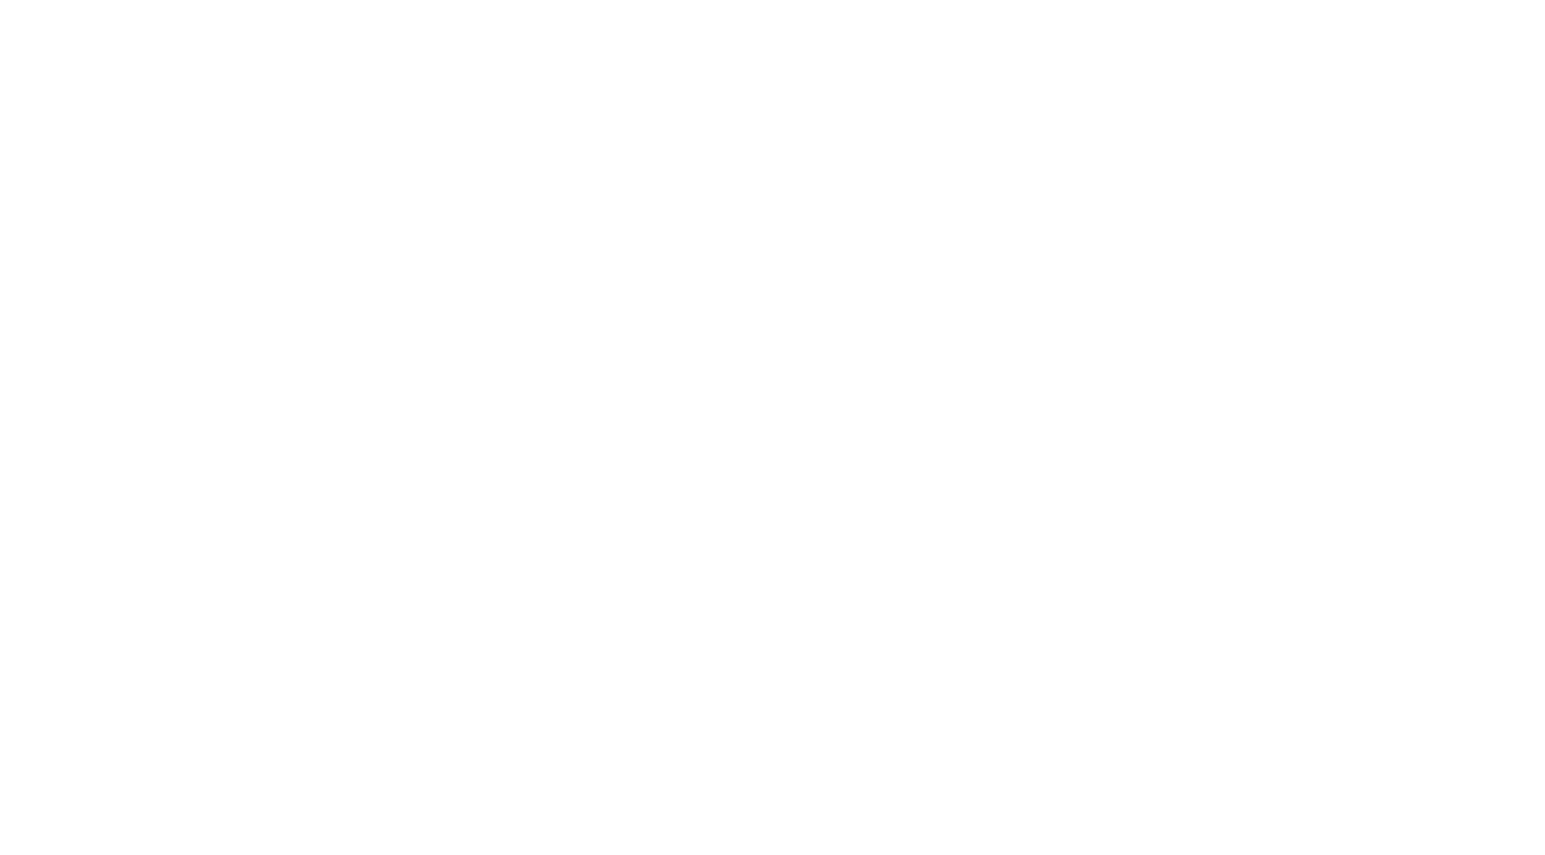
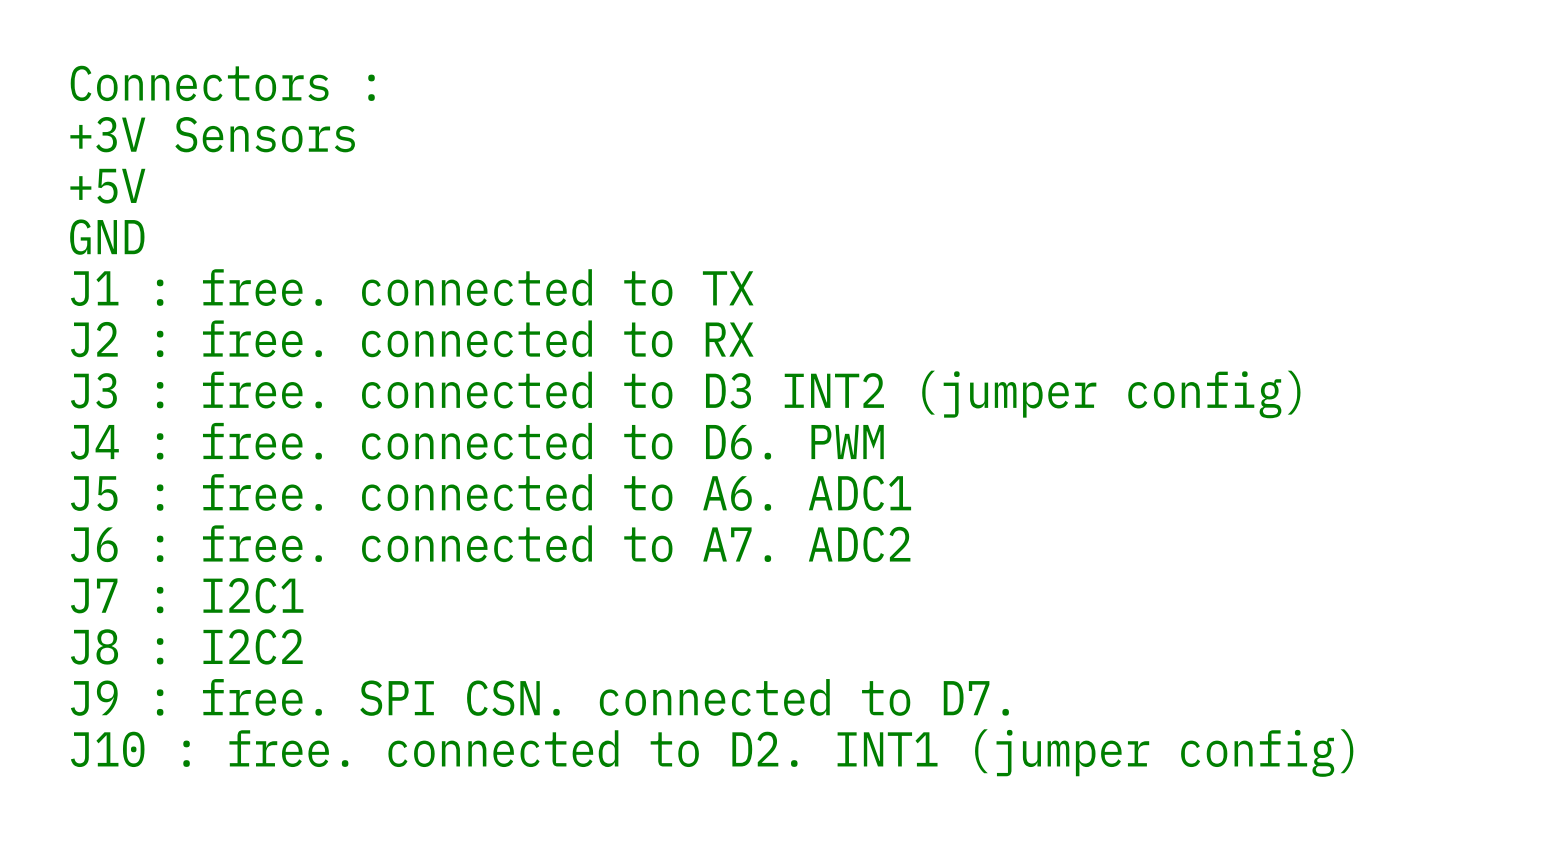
text: none -> Connectors : (222, 83)
text: none -> +3V Sensors (212, 134)
text: none -> +5V (107, 186)
text: none -> GND (107, 237)
text: none -> J1 : free. connected to TX (412, 287)
text: none -> J2 : free. connected to RX (412, 338)
text: none -> J3 : free. connected to D3 INT2 (jumper config) (685, 394)
text: none -> J4 : free. connected to D6. PWM (477, 441)
text: none -> J5 : free. connected to A6. ADC1 (491, 492)
text: none -> J6 : free. connected to A7. ADC2 (490, 543)
text: none -> J7 : I2C1 (187, 595)
text: none -> J8 : I2C2 (186, 646)
text: none -> J9 : free. SPI CSN. connected to D7. (539, 697)
text: none -> J10 : free. connected to D2. INT1 (jumper config) (712, 753)

